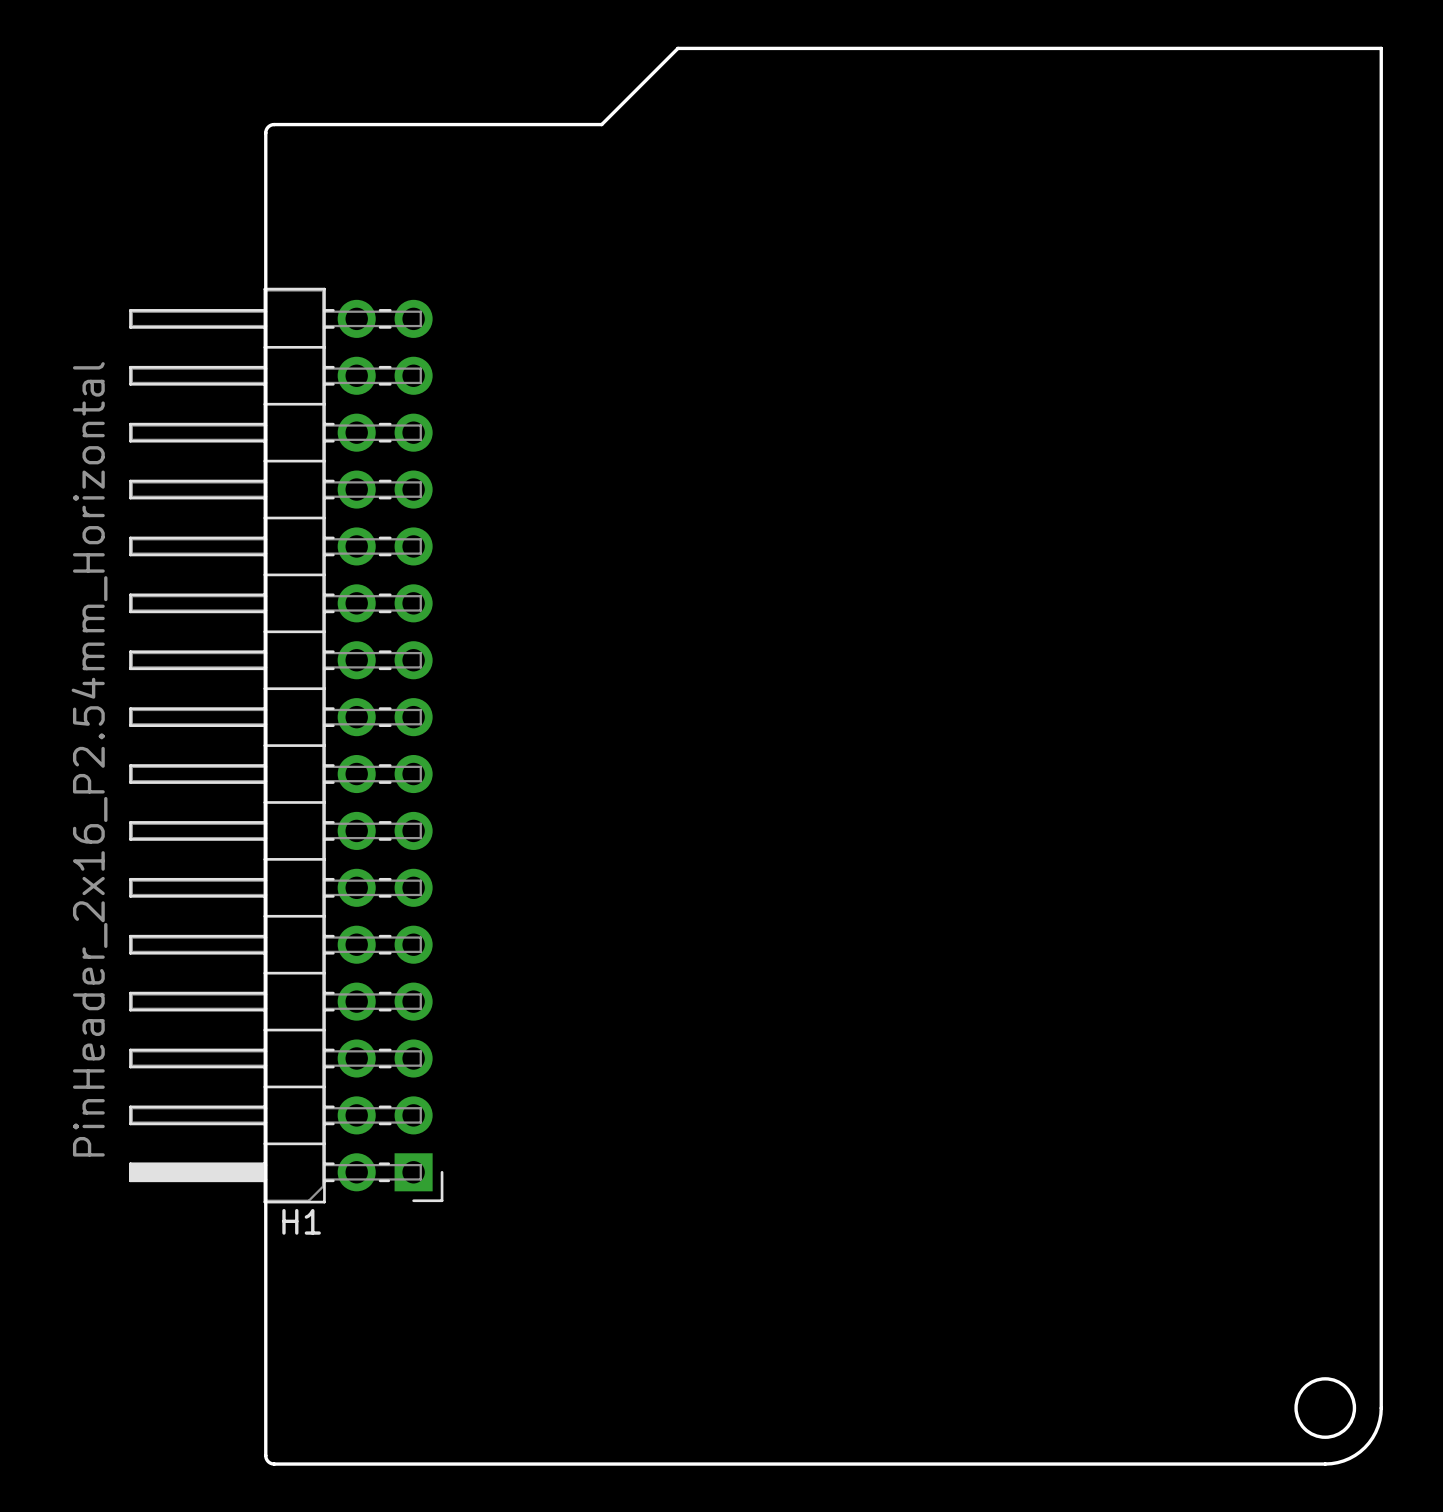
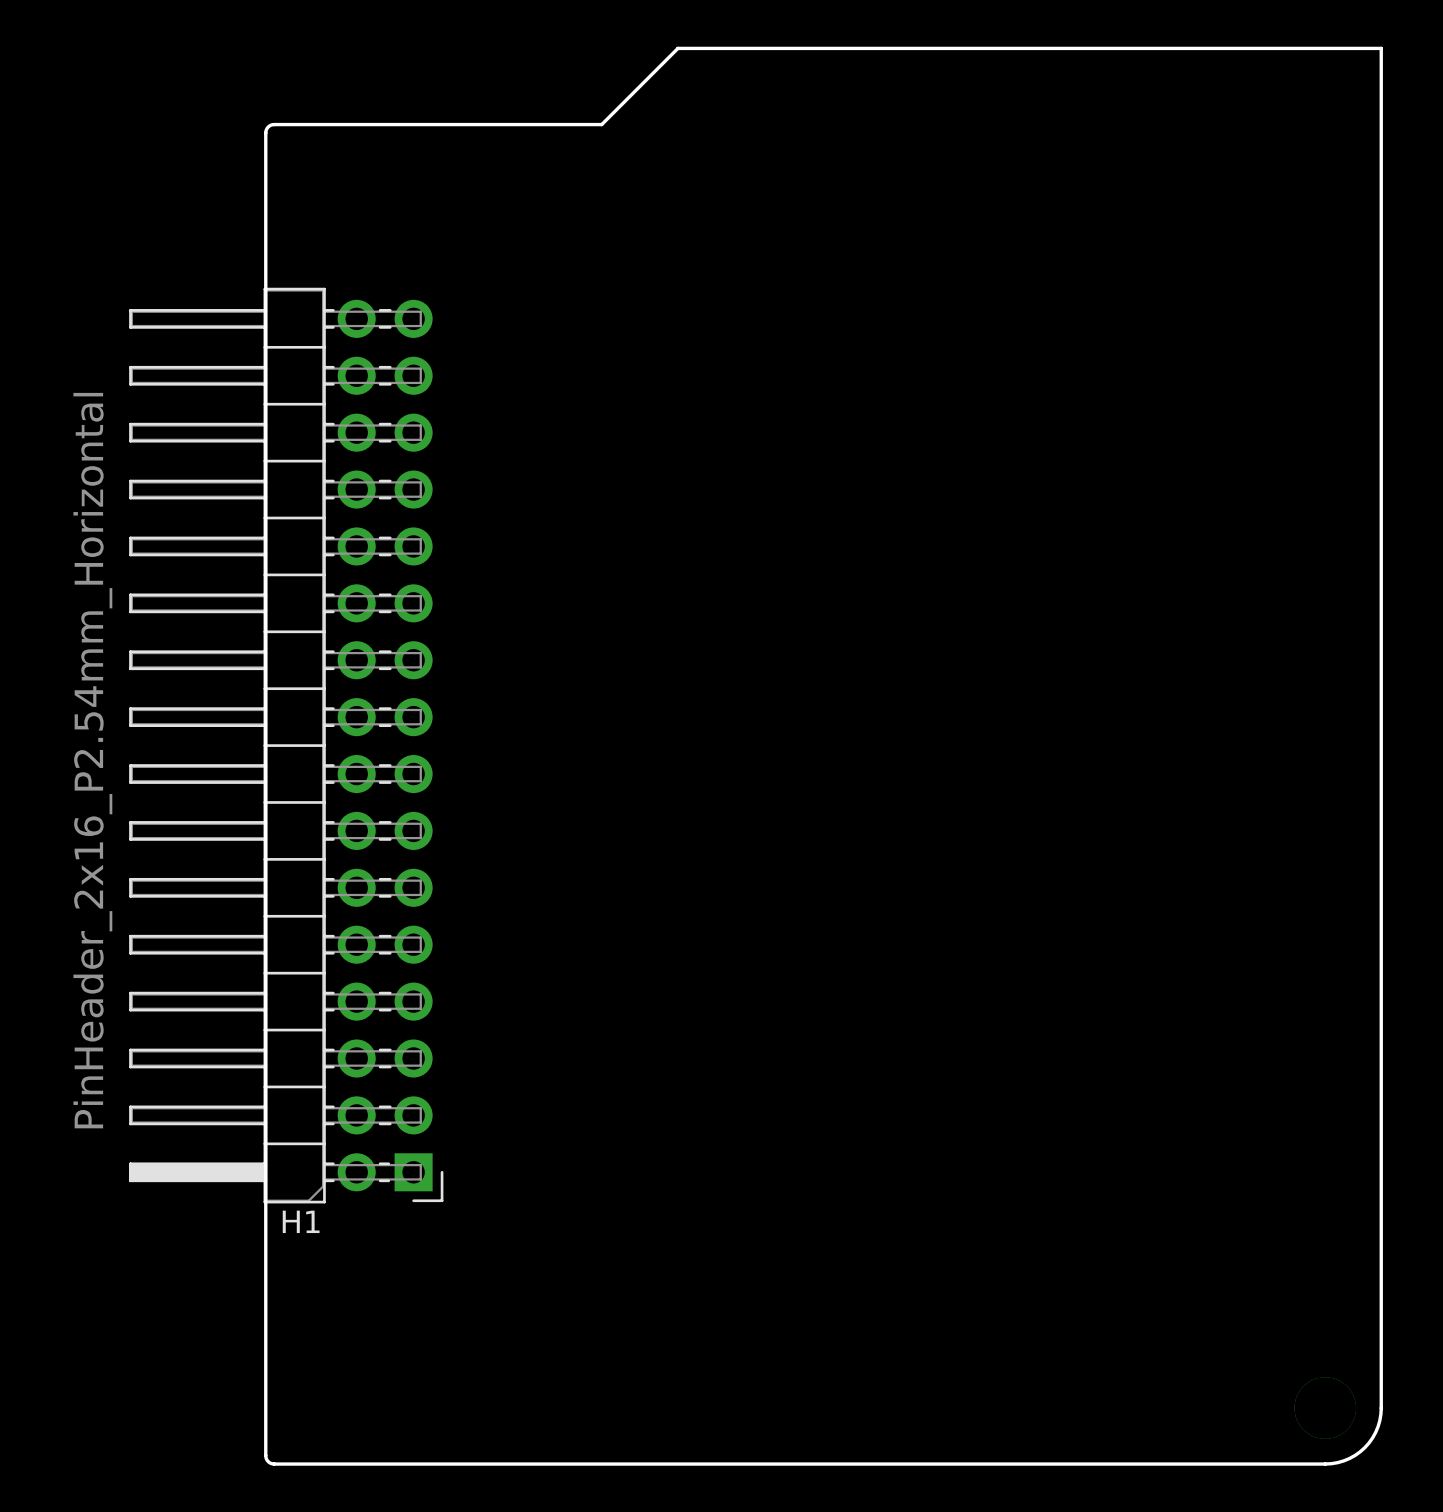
round board edge: [1294, 1377, 1357, 1439] -> none

